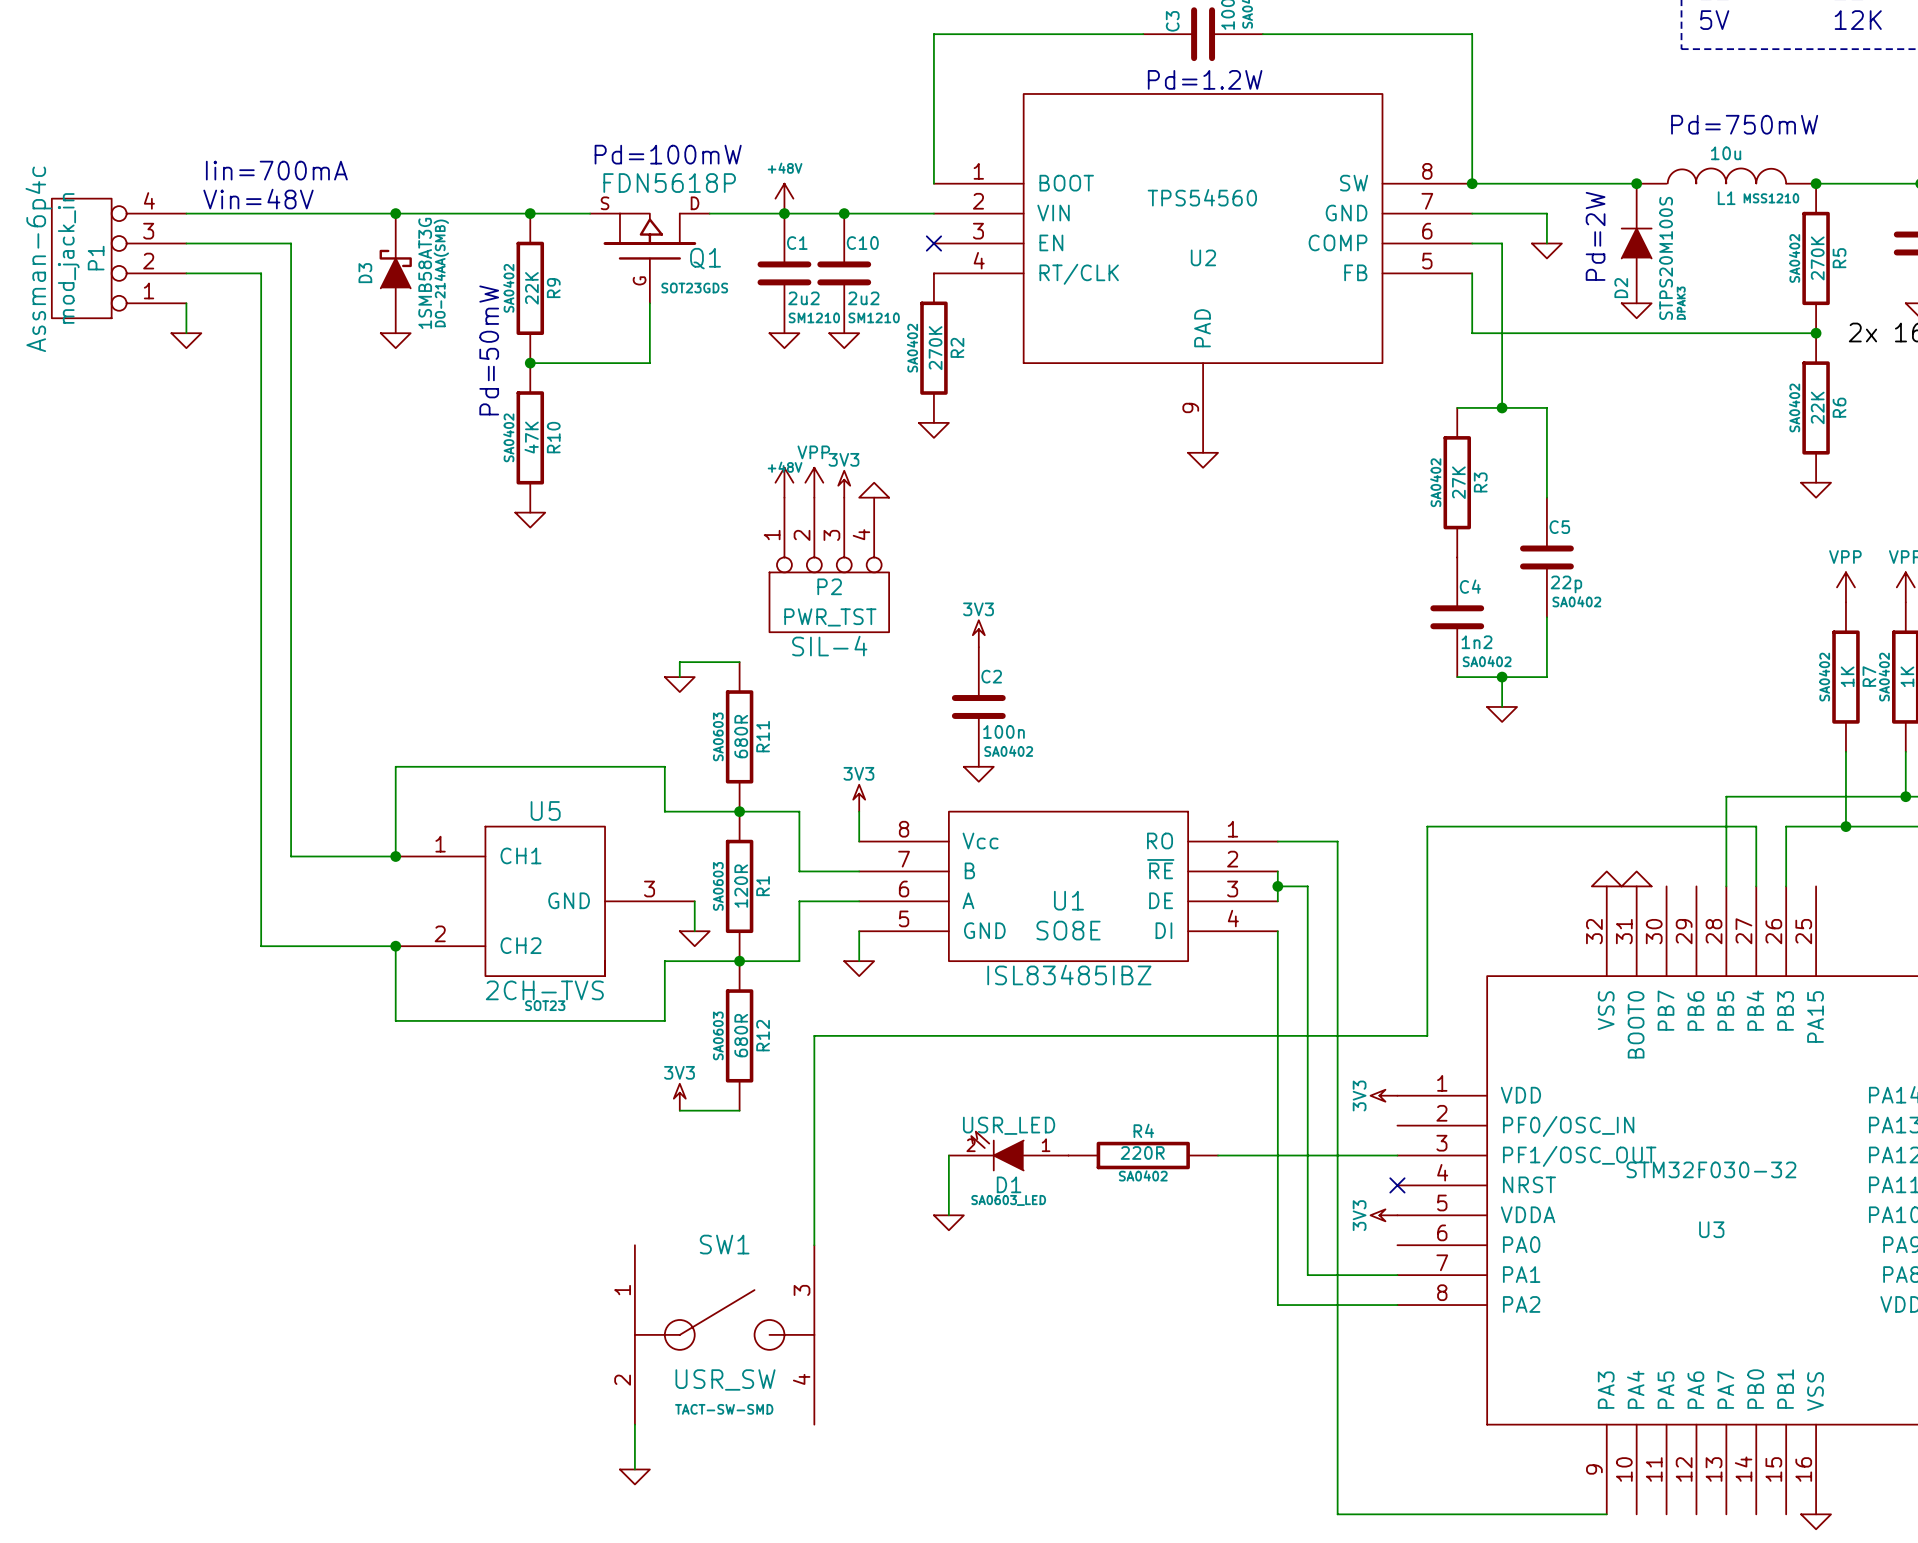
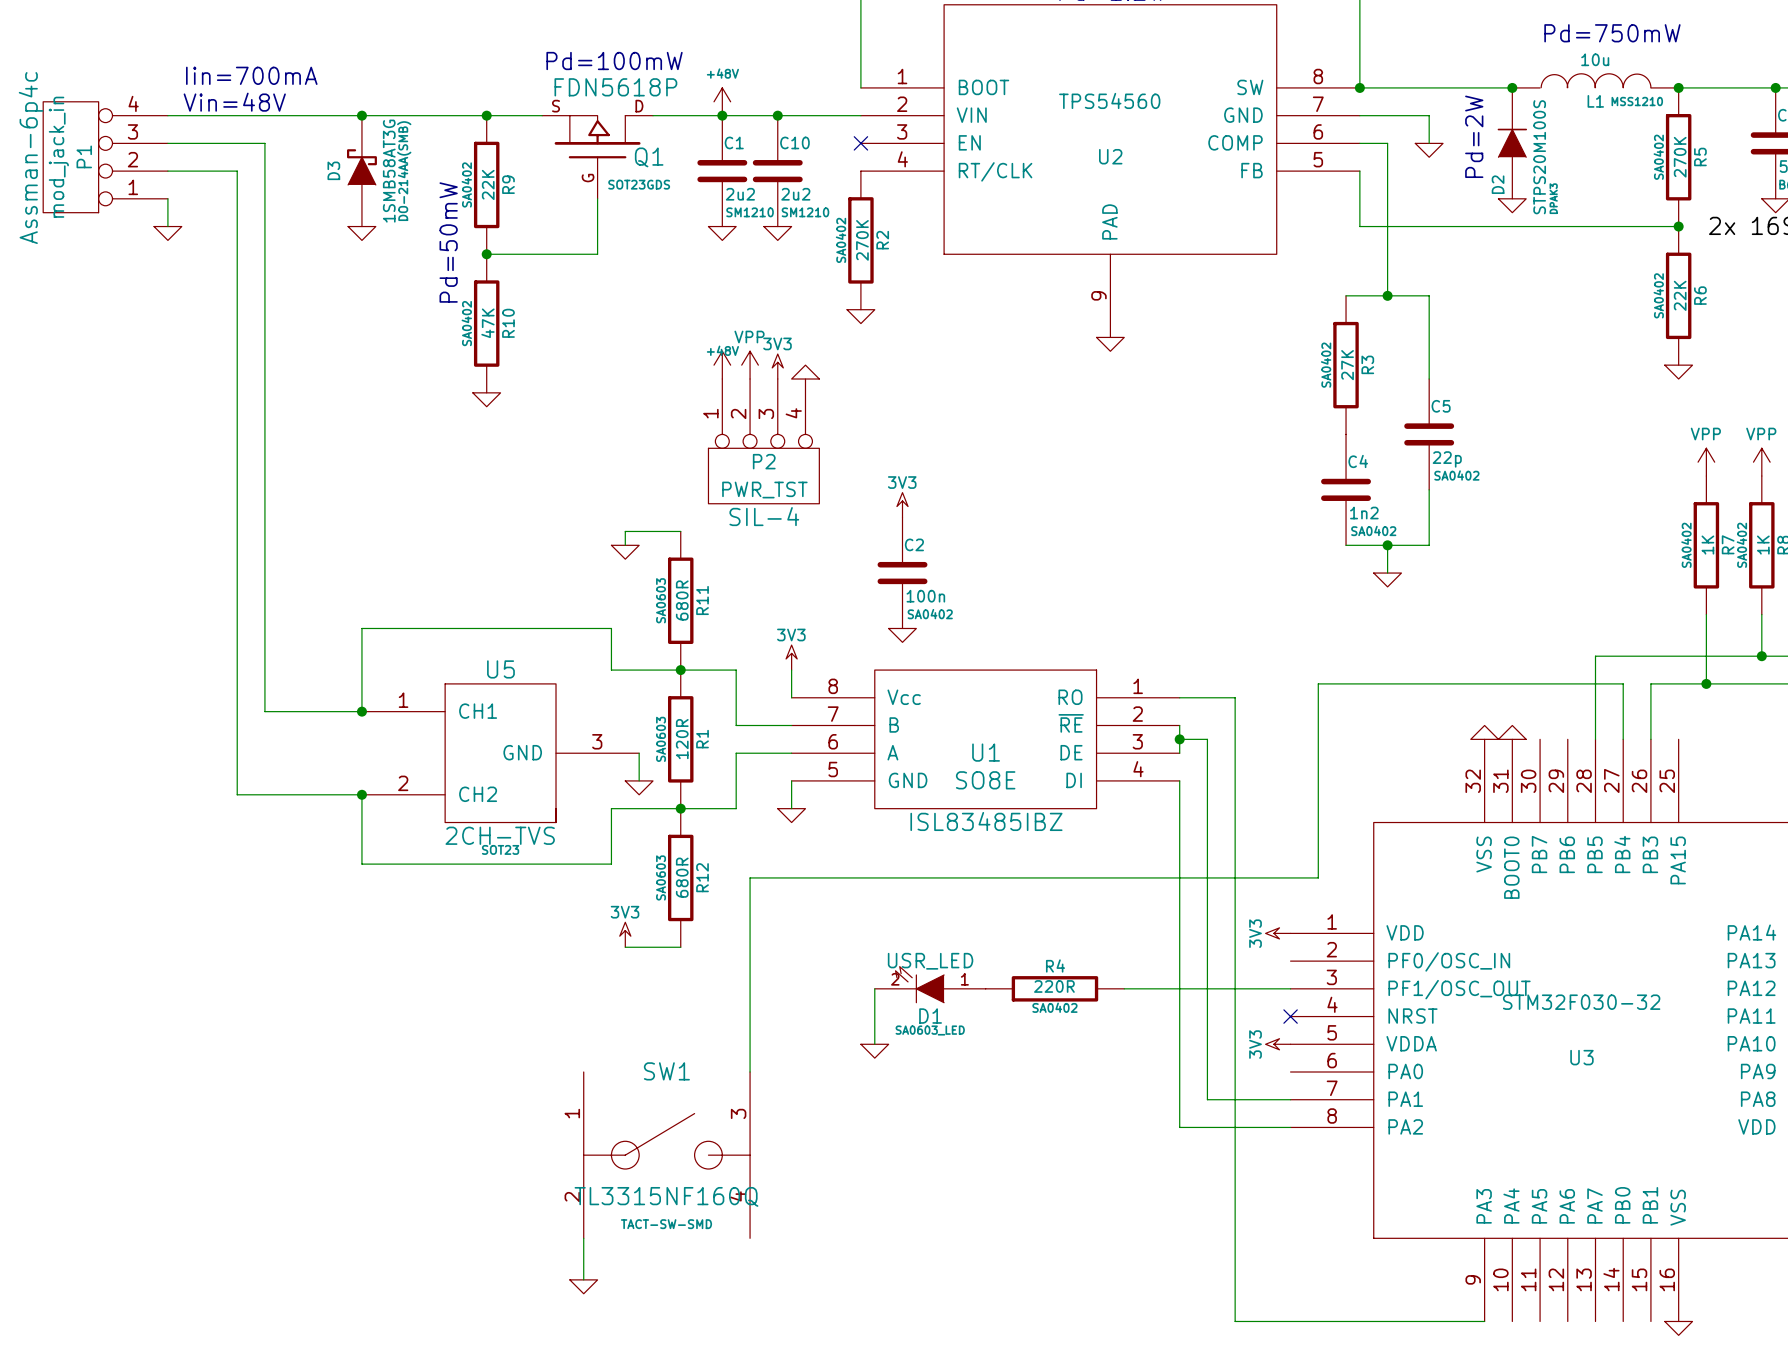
SW1 value: USR_SW (725, 1379) -> TL3315NF160Q (666, 1196)

